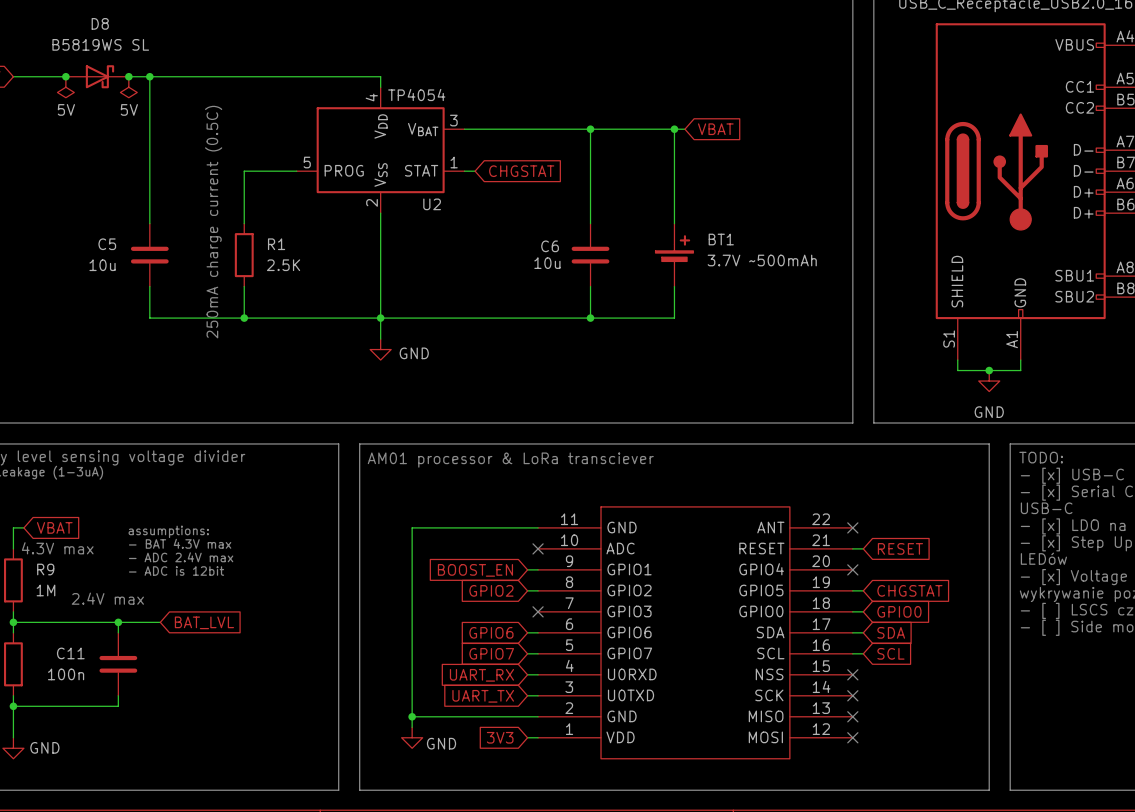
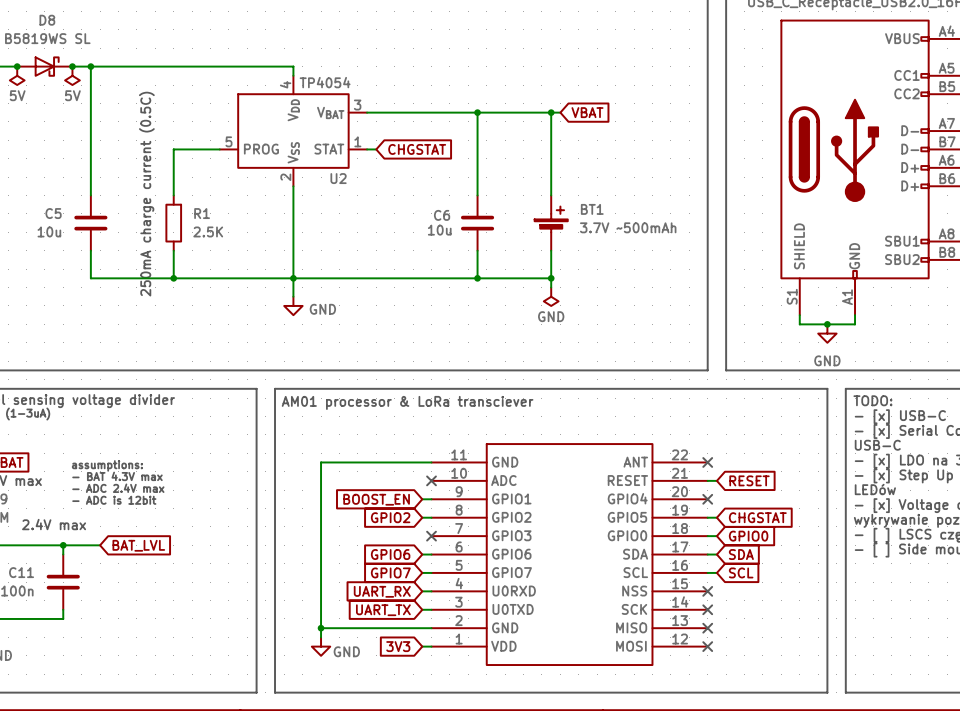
wire: none -> (551, 278) (551, 287)
junction: none -> (551, 278)
power symbol: none -> GND (551, 296)

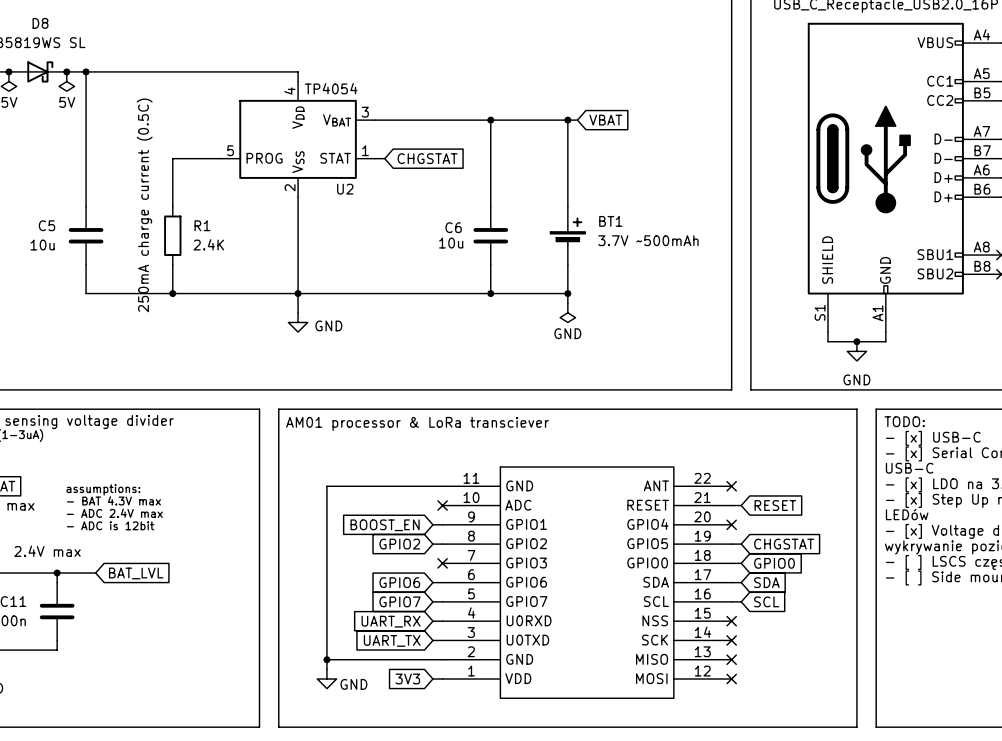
R1 value: 2.5K (208, 231) -> 2.4K (208, 244)

